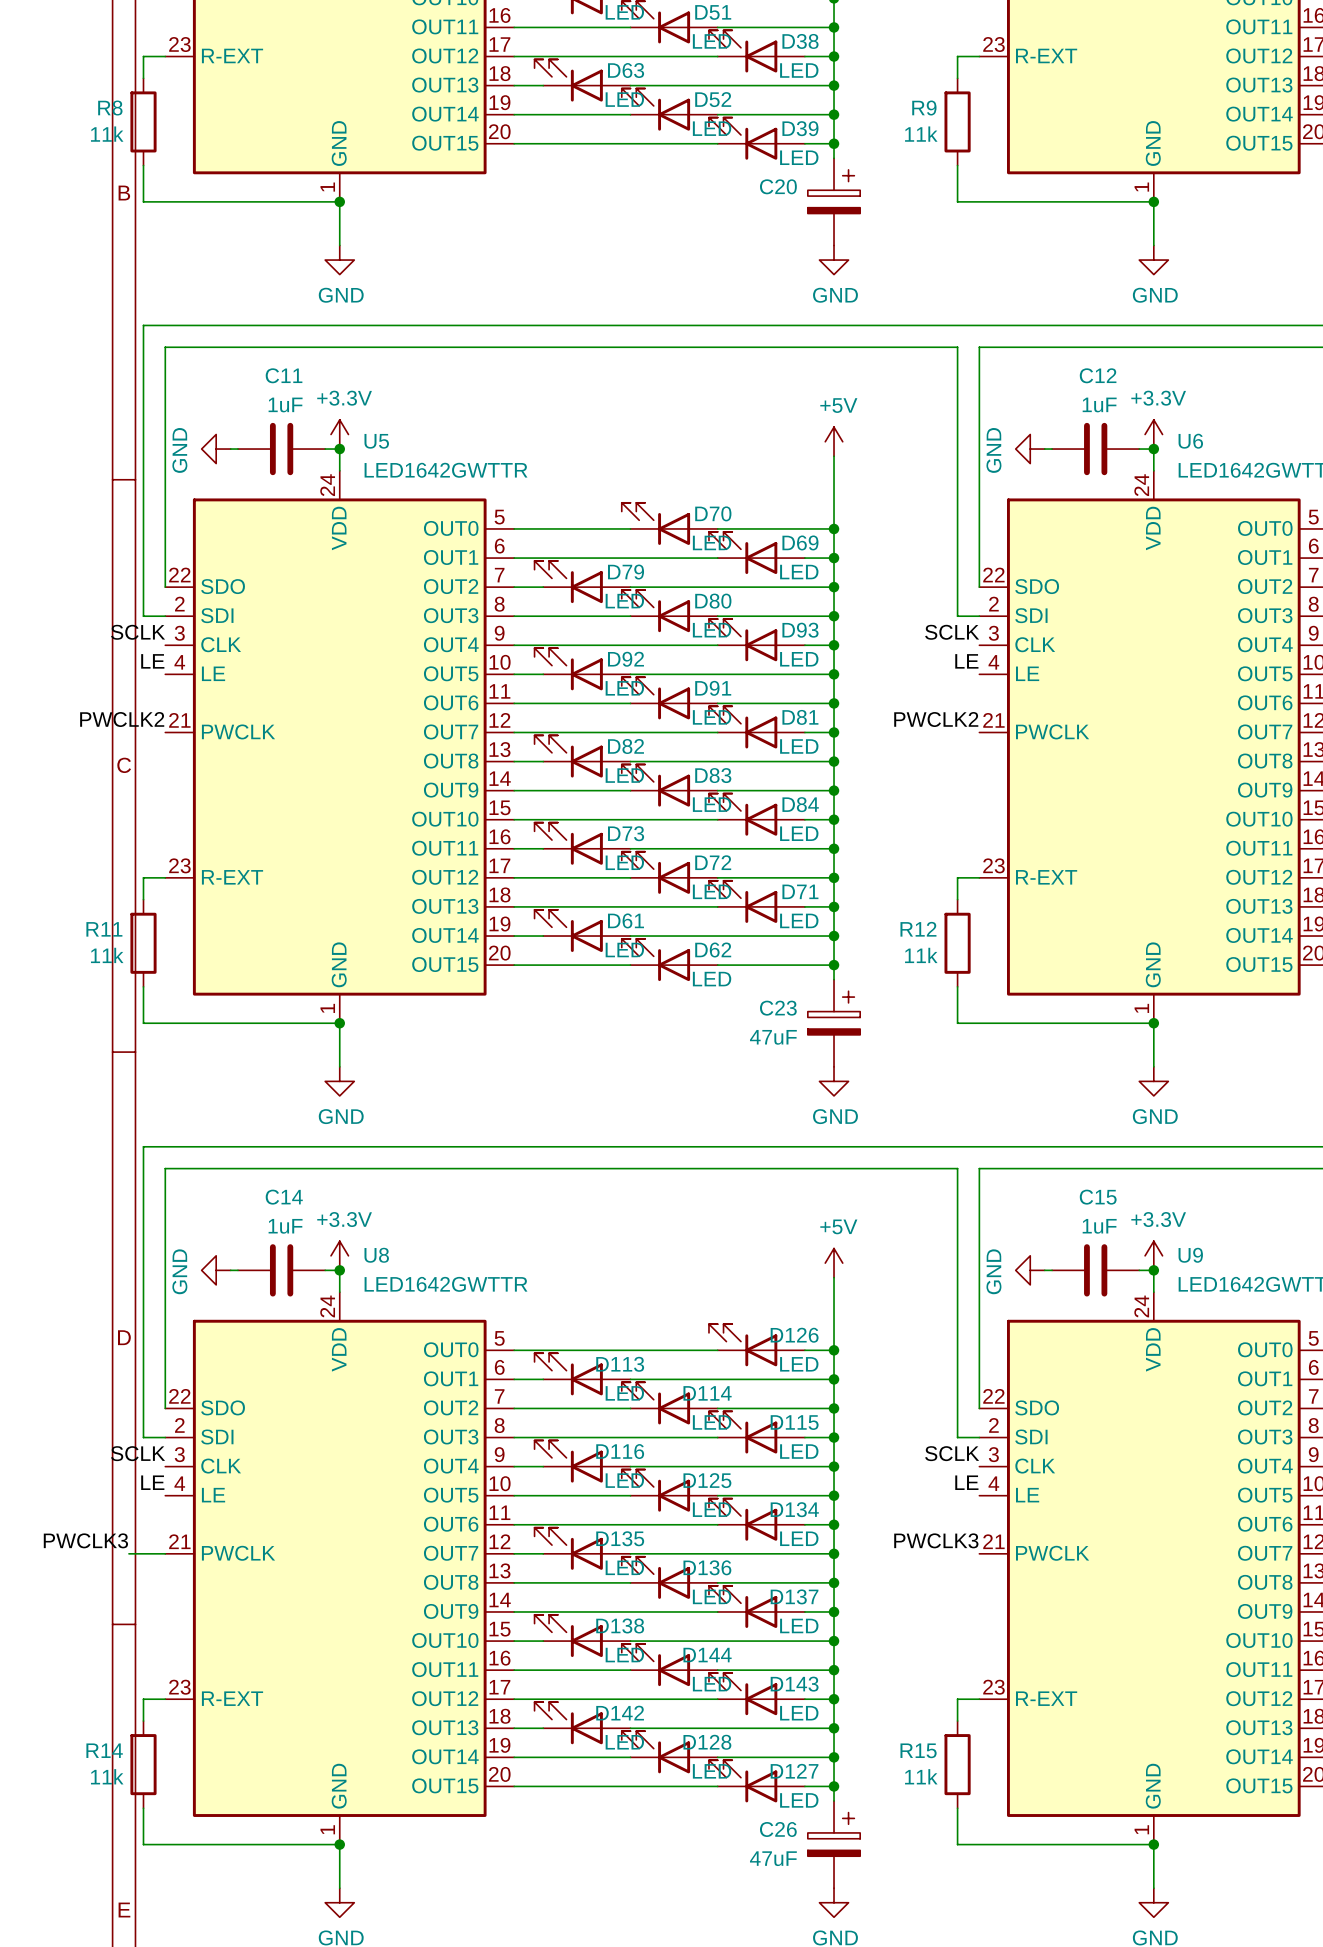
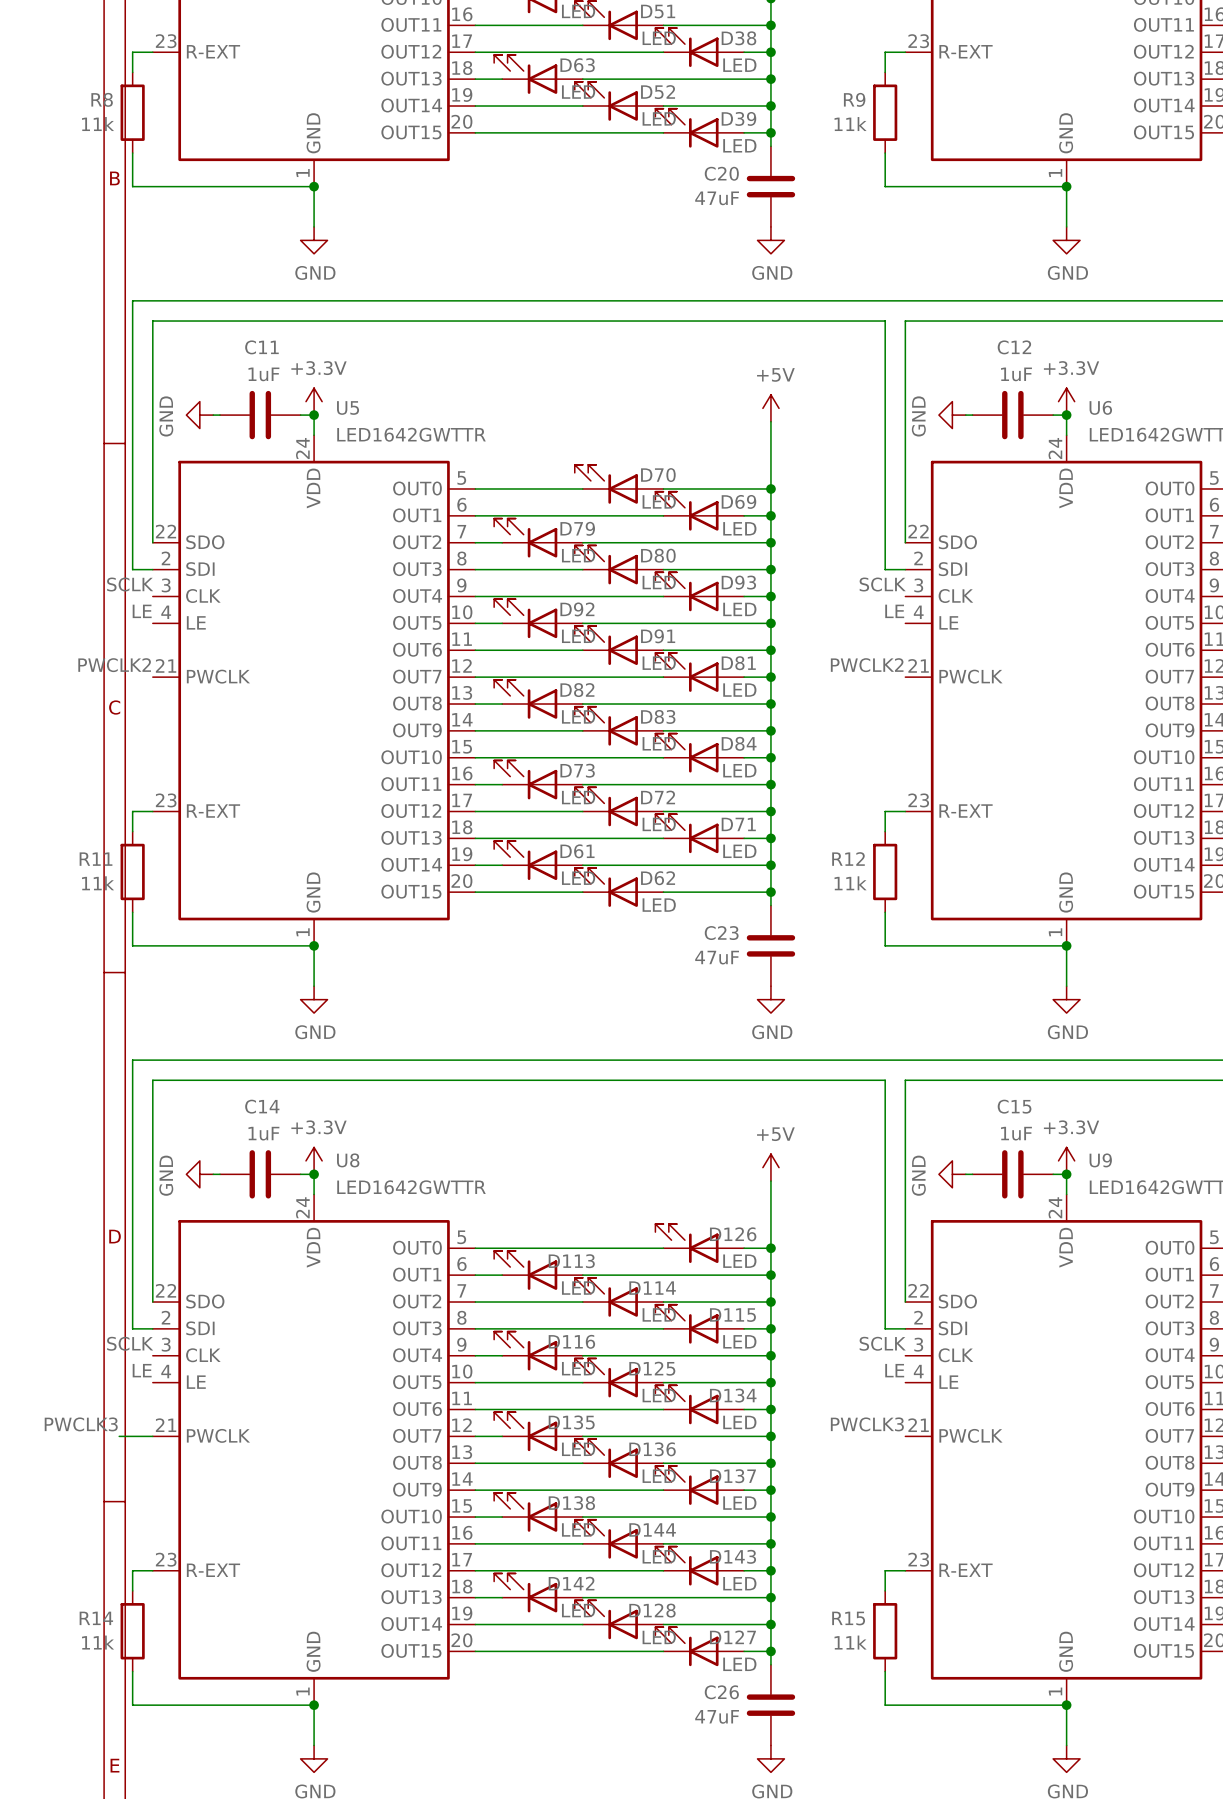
C20 symbol: [807, 158, 861, 246] -> [746, 146, 796, 227]
C20 value: none -> 47uF (717, 198)
C23 symbol: [807, 979, 861, 1067] -> [746, 905, 796, 987]
C26 symbol: [807, 1800, 861, 1889] -> [746, 1664, 796, 1746]

